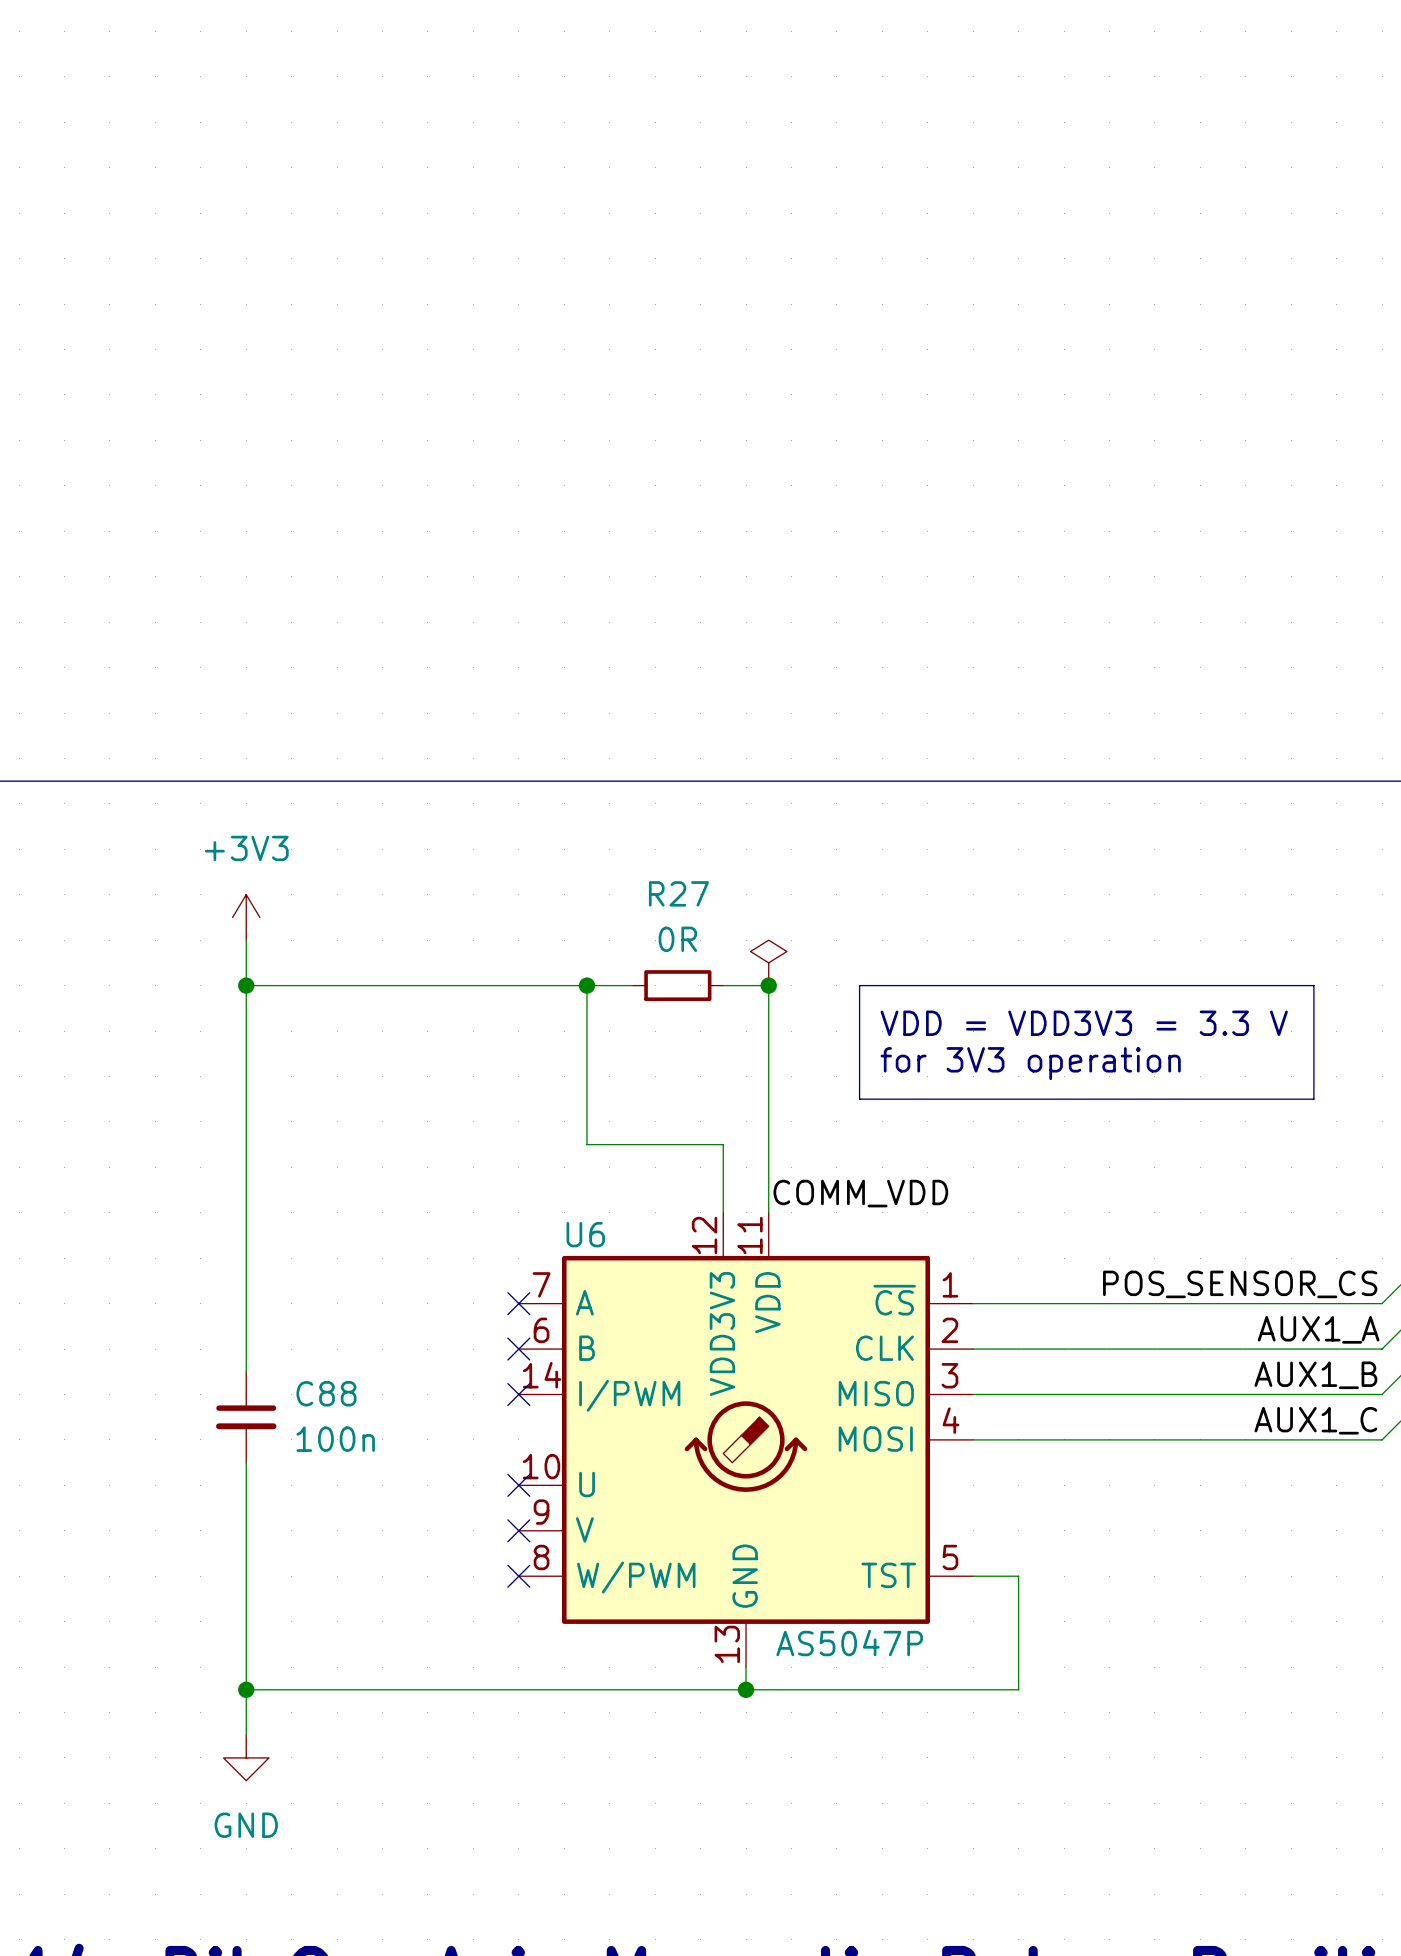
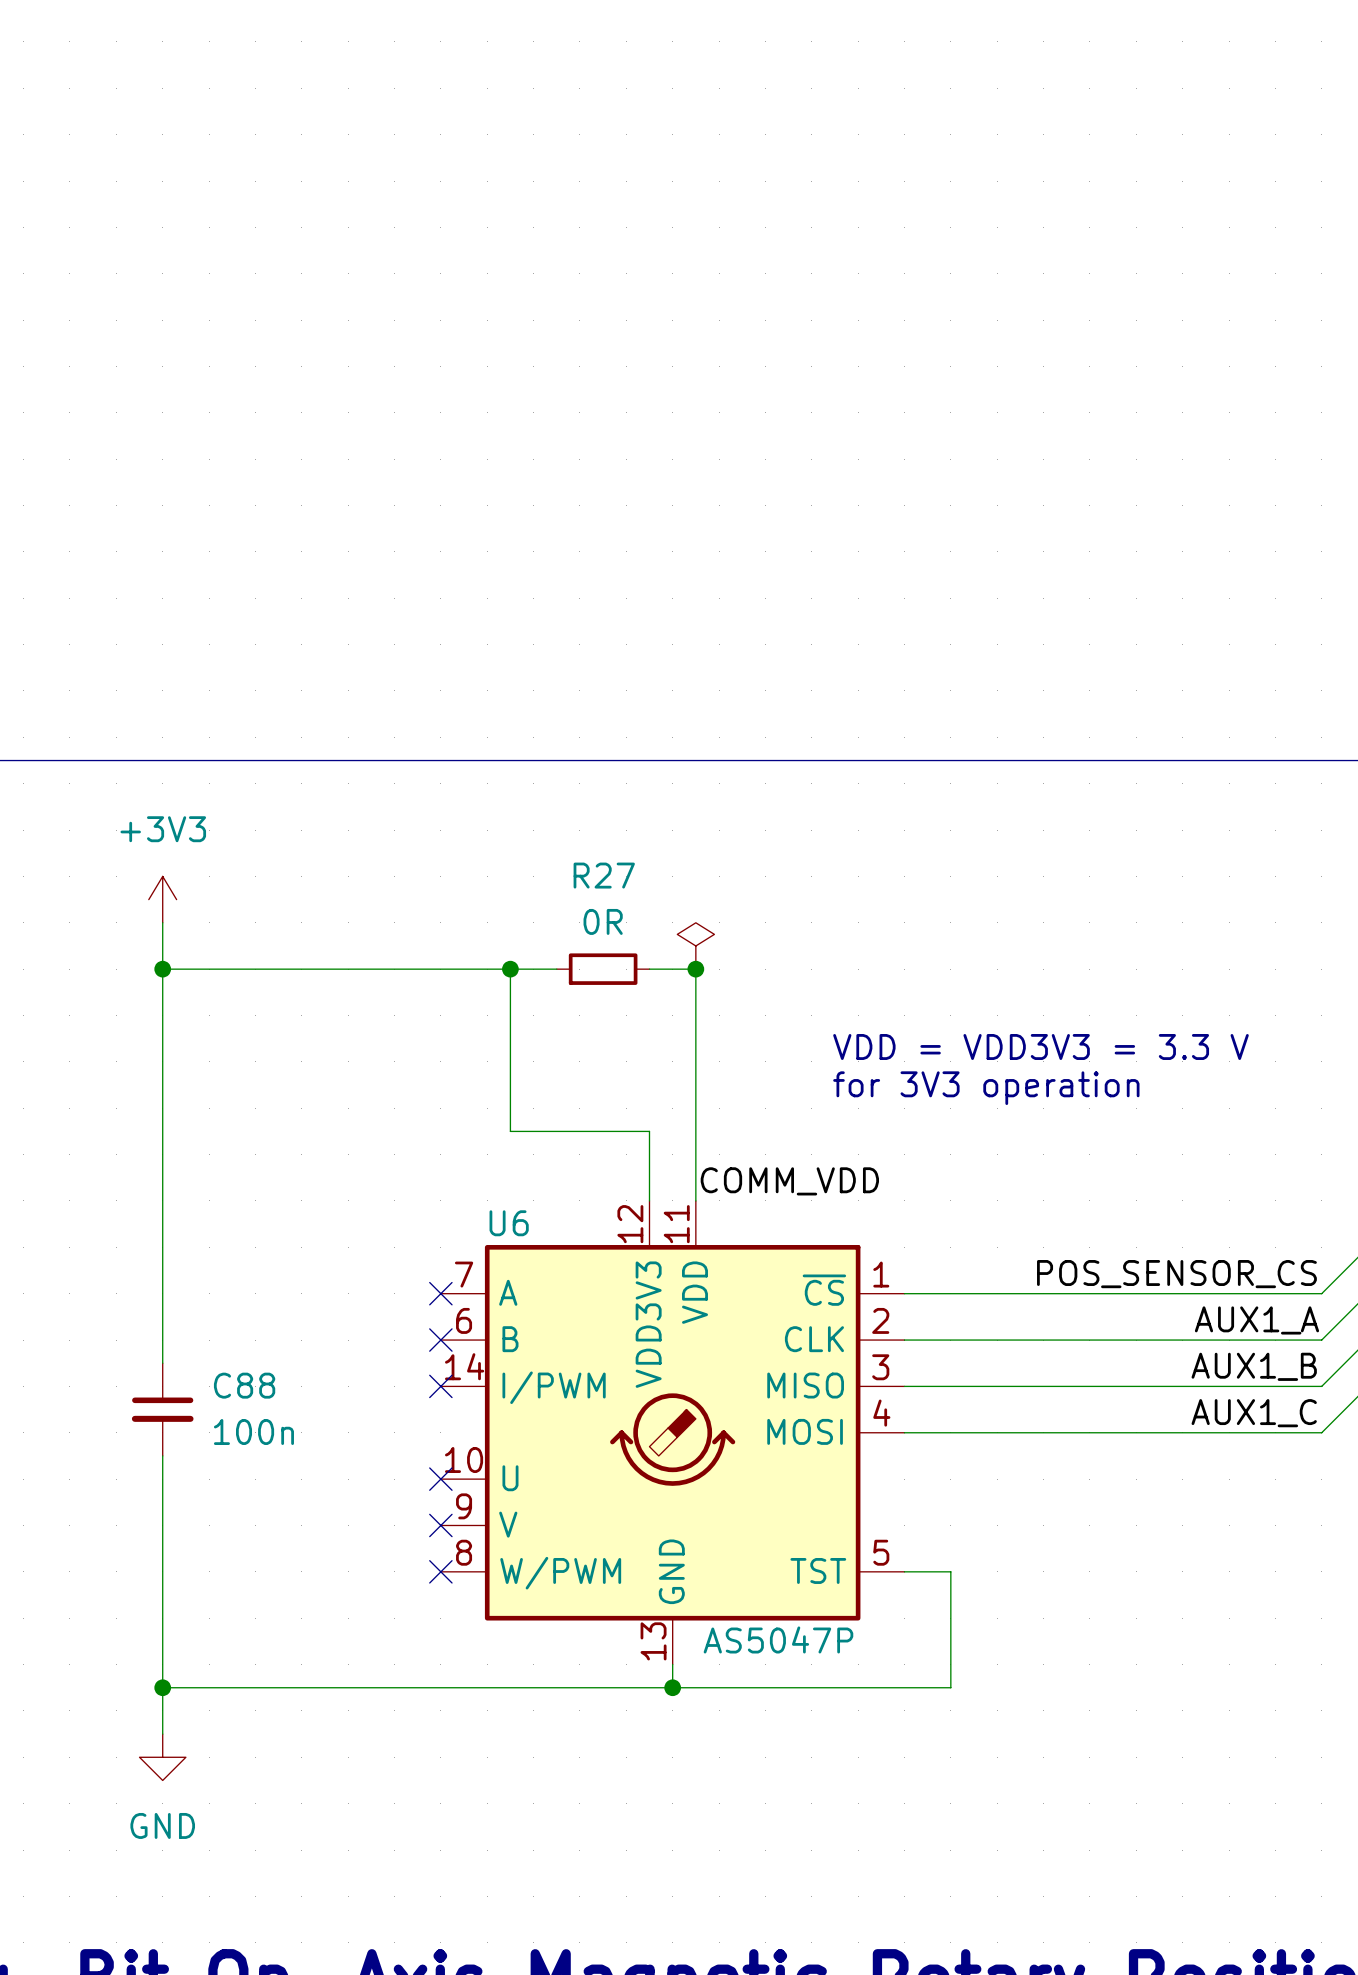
line: (859, 985) (1313, 985) (1313, 1099) (859, 1099) (859, 985) -> none
text position: VDD = VDD3V3 = 3.3 V (1084, 1023) -> VDD = VDD3V3 = 3.3 V (1040, 1046)
text position: for 3V3 operation (1030, 1063) -> for 3V3 operation (986, 1088)

